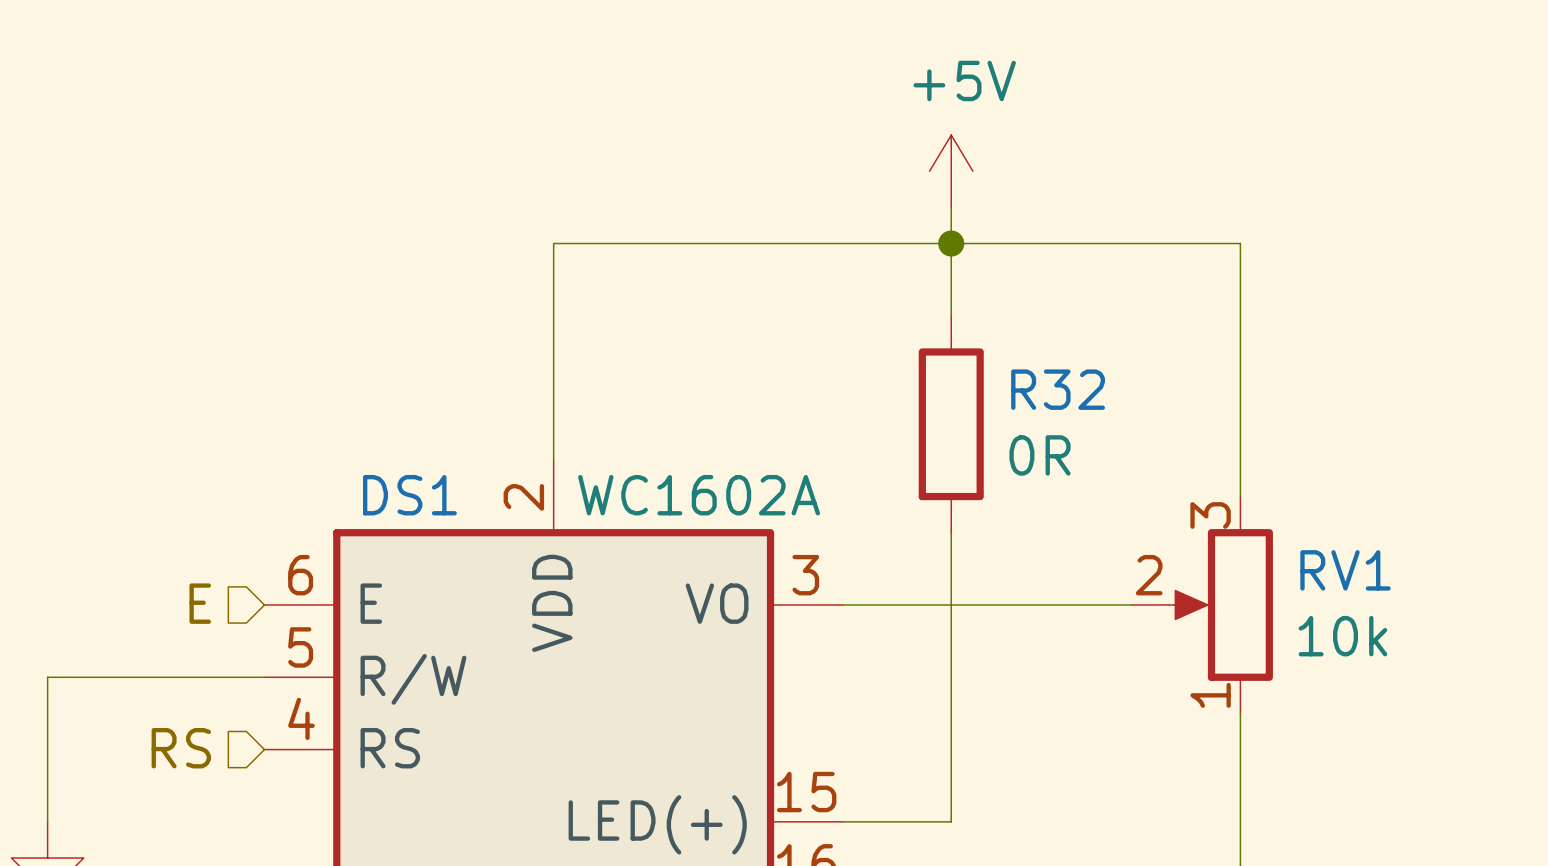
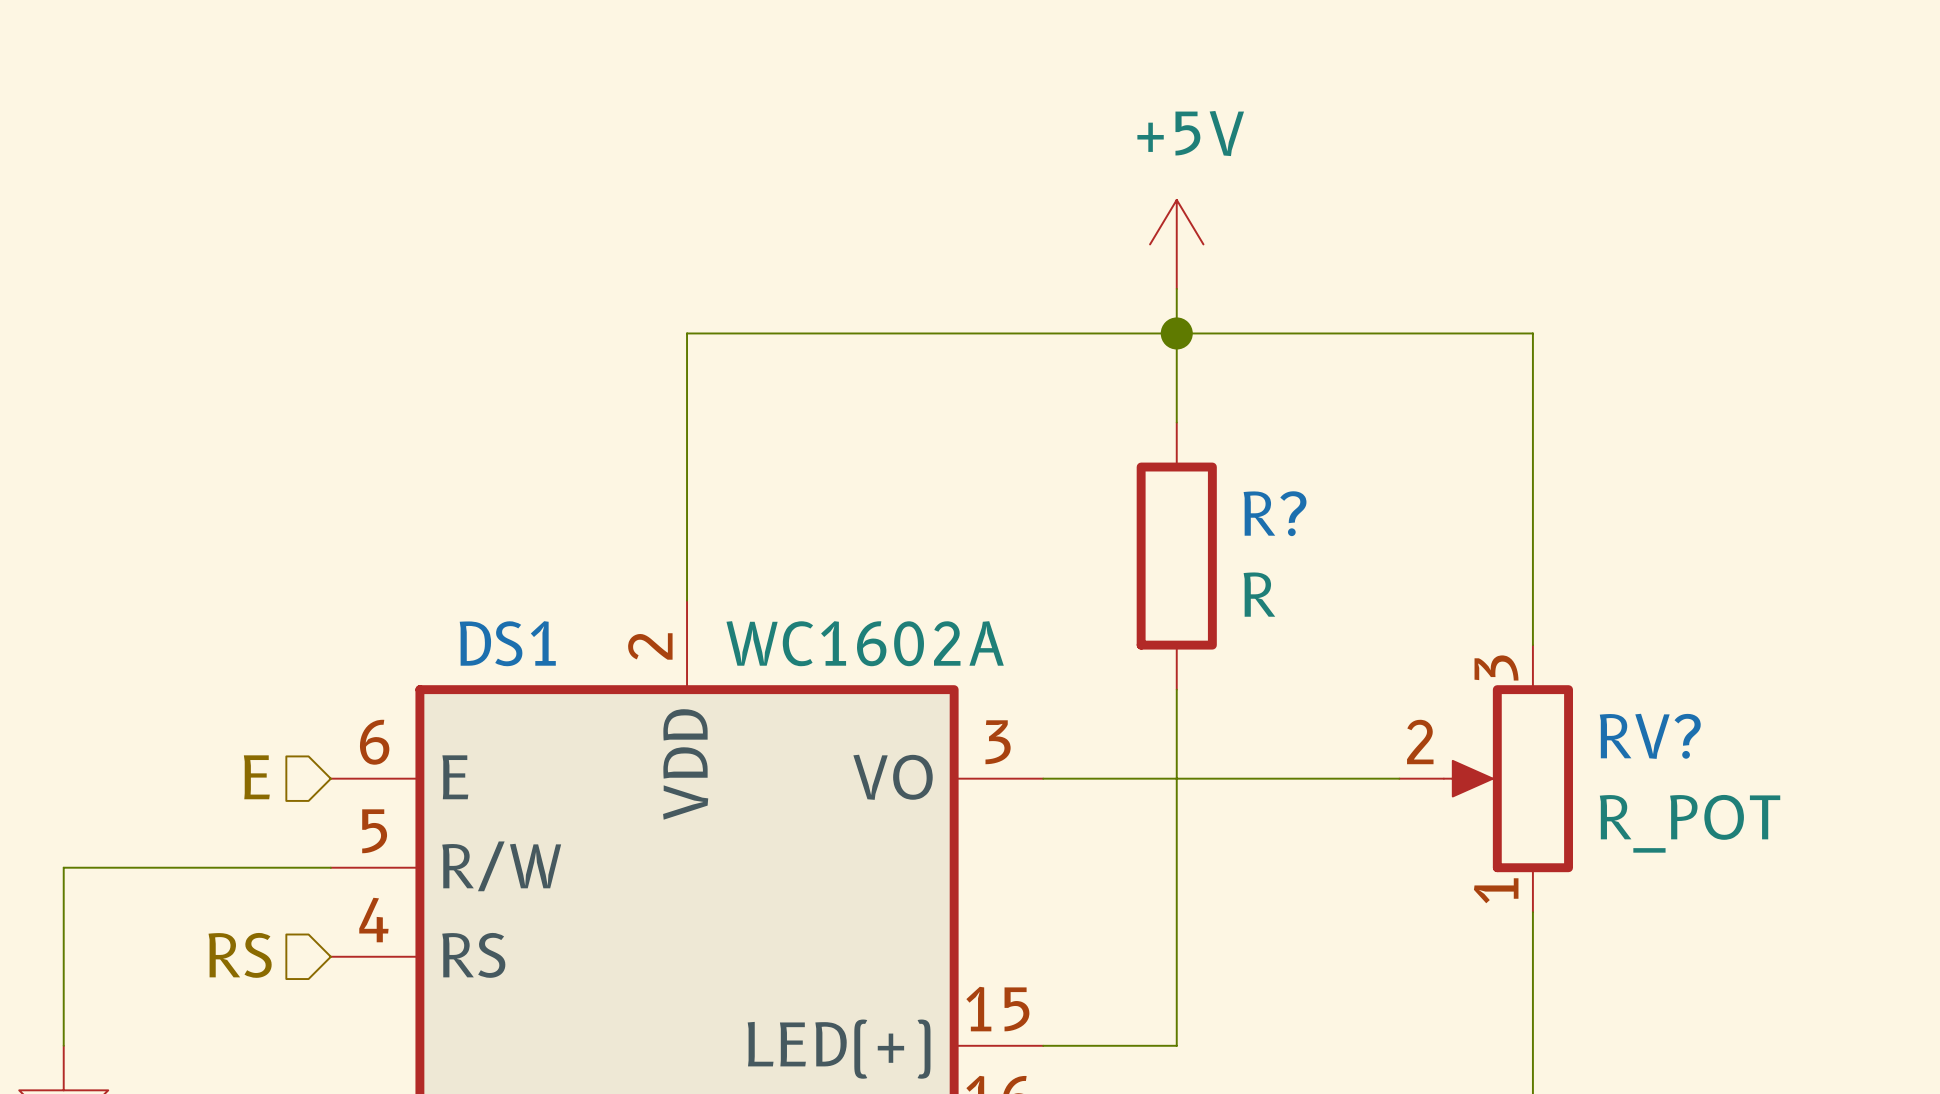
R32 name: R32 (1058, 389) -> R? (1275, 513)
R32 value: 0R (1039, 455) -> R (1259, 594)
RV1 name: RV1 (1345, 570) -> RV? (1650, 736)
RV1 value: 10k (1342, 636) -> R_POT (1690, 823)

